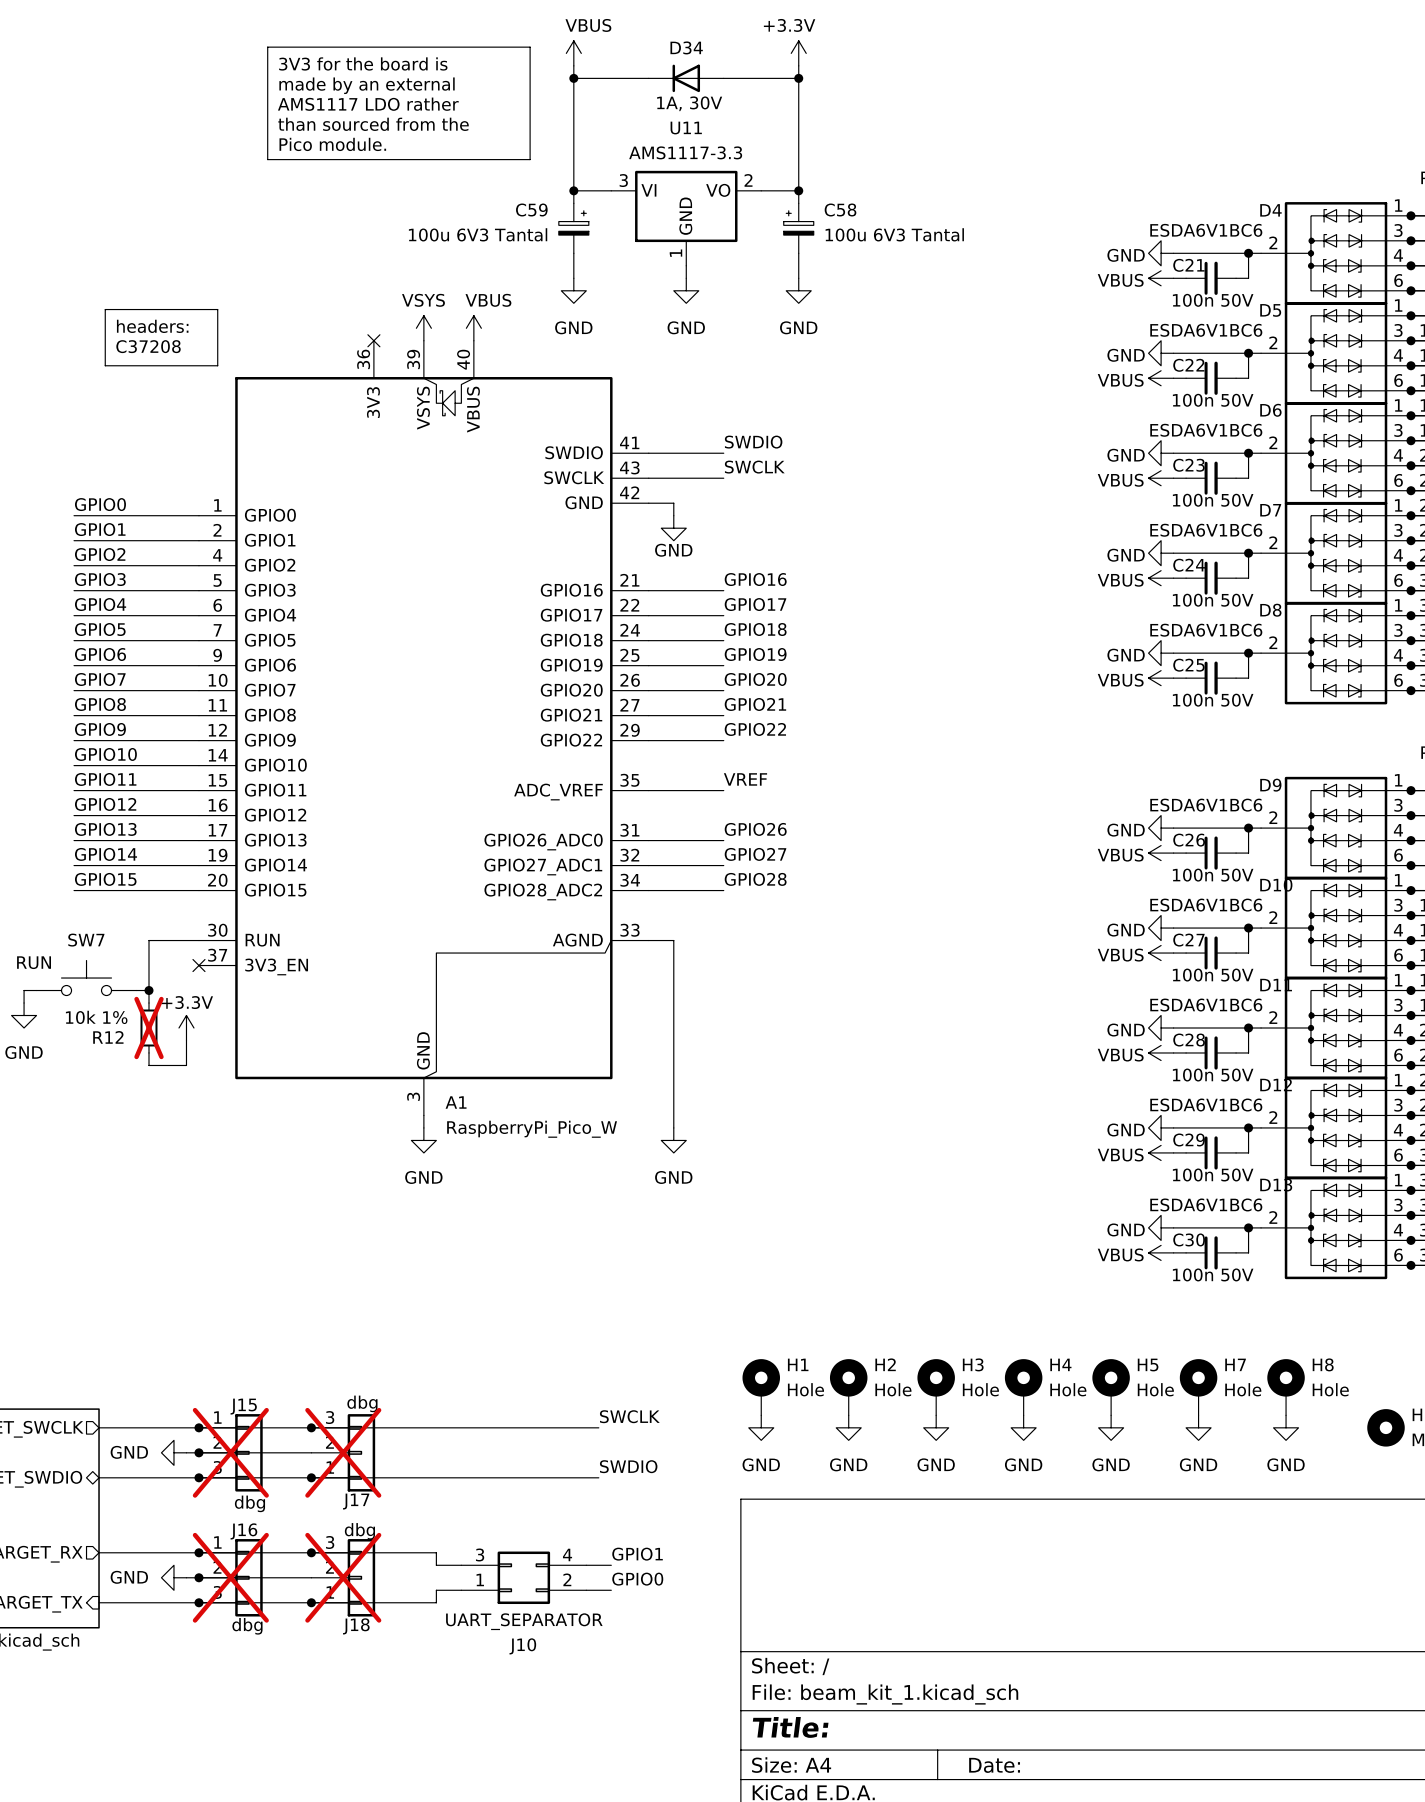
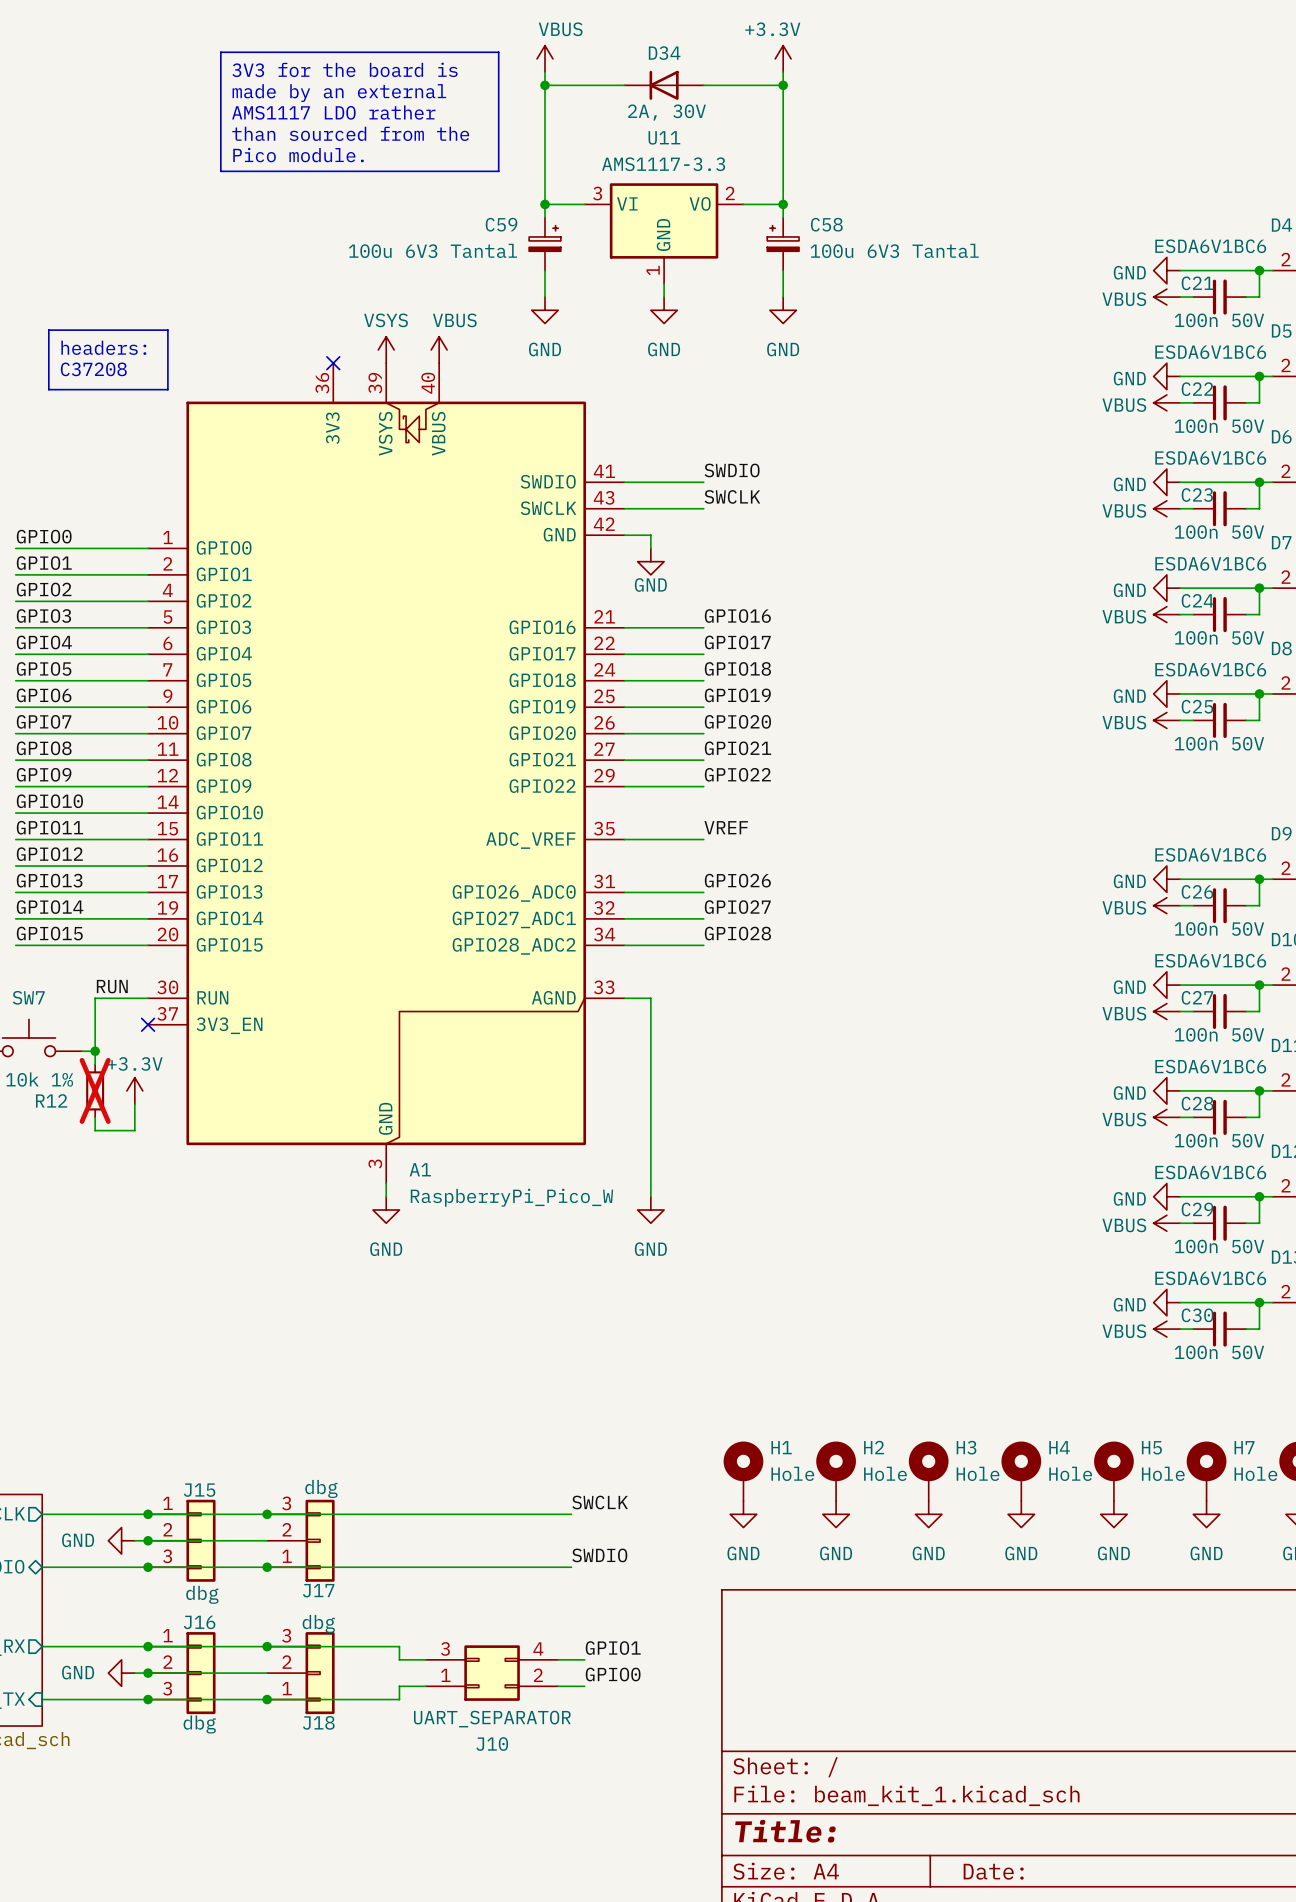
D34 value: 1A, 30V (689, 103) -> 2A, 30V (667, 112)
label: none -> RUN (112, 986)
J15 do-not-place cross: (230, 1452) -> none
J17 do-not-place cross: (343, 1452) -> none
J16 do-not-place cross: (230, 1577) -> none
J18 do-not-place cross: (343, 1577) -> none

